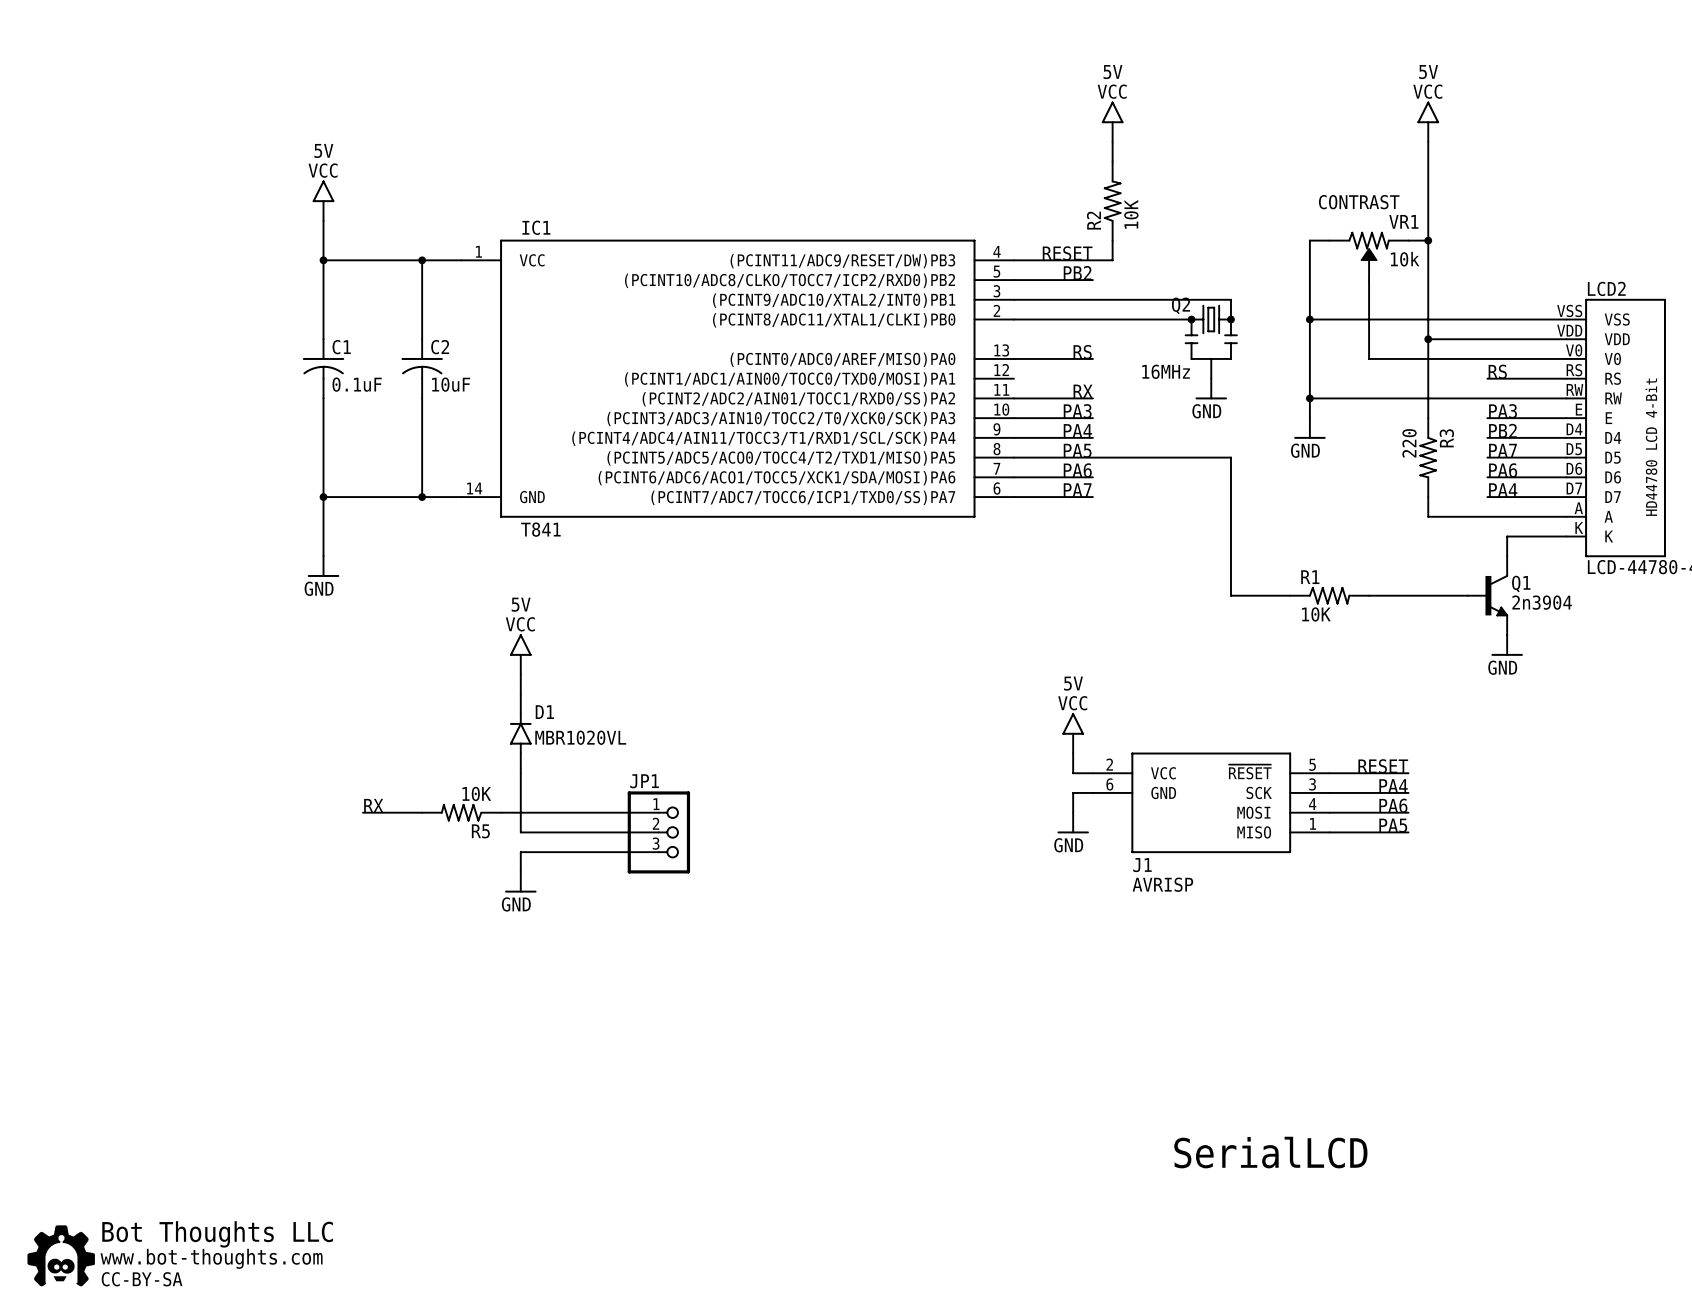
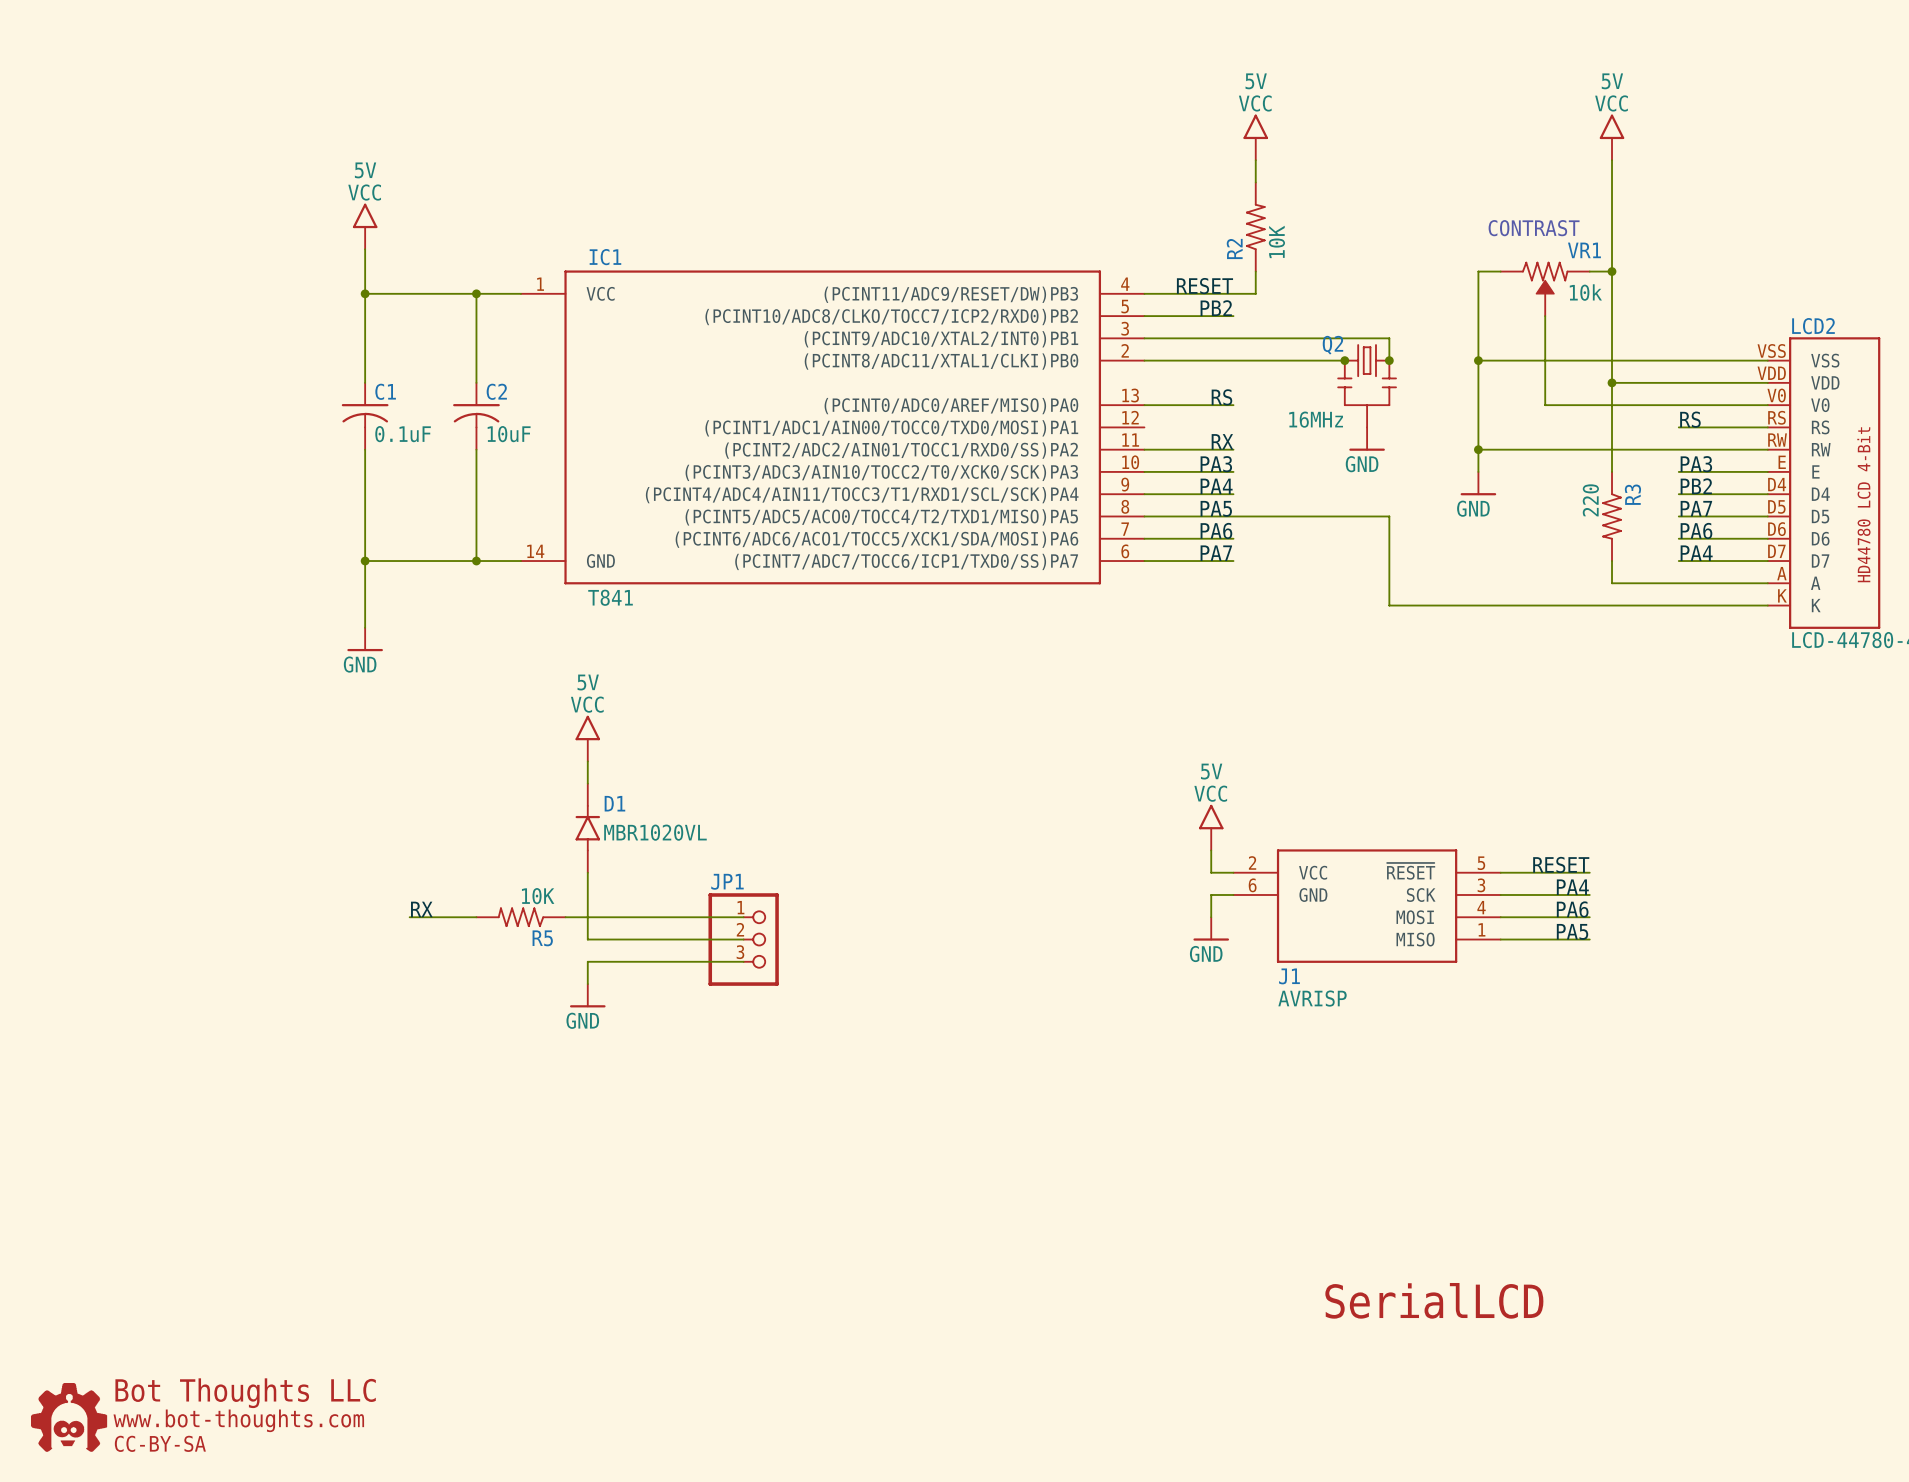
wire: (1230, 536) (1230, 595) (1290, 595) -> (1389, 605) (1701, 605)
wire: (1507, 536) (1507, 556) -> none
R1: 10K (1329, 595) -> none
wire: (1369, 595) (1467, 595) -> none
Q1: 2n3904 (1487, 595) -> none
power symbol: GND (1507, 645) -> none

